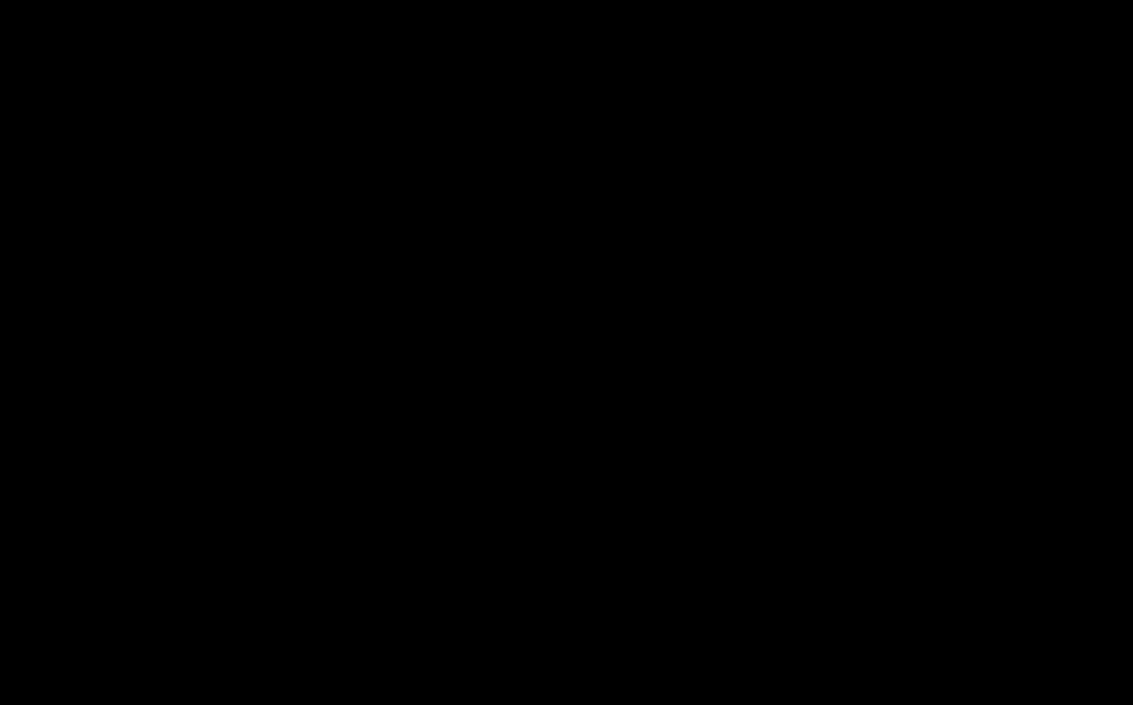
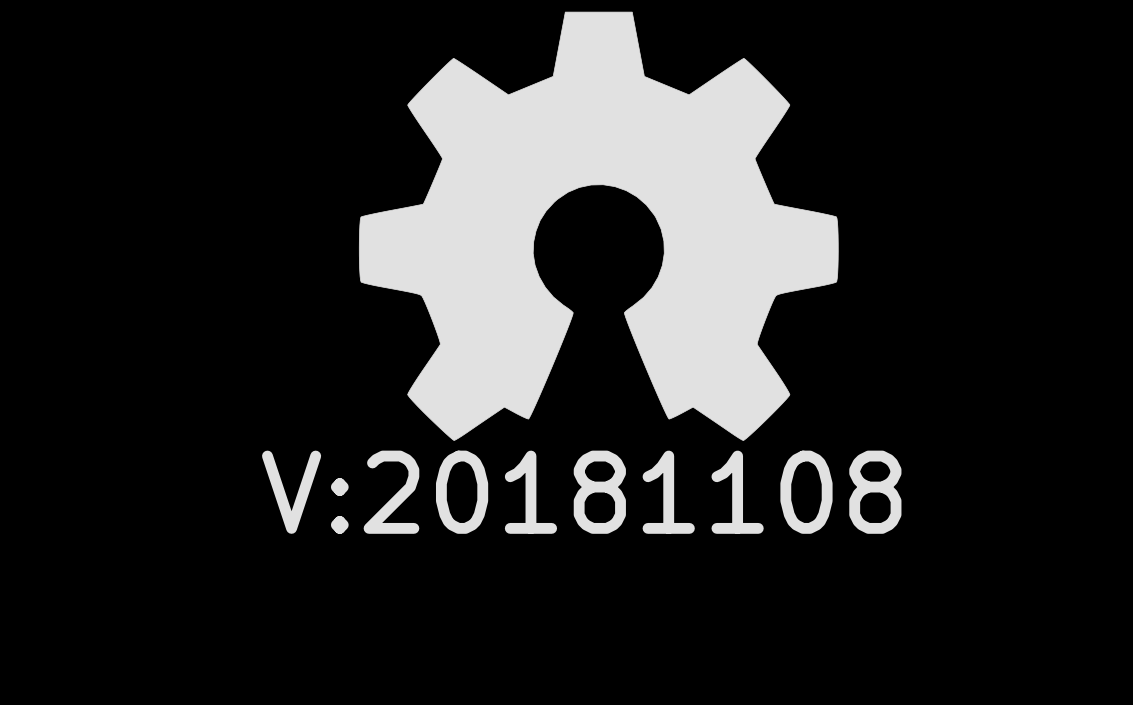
drawing: none -> [358, 11, 839, 441]

